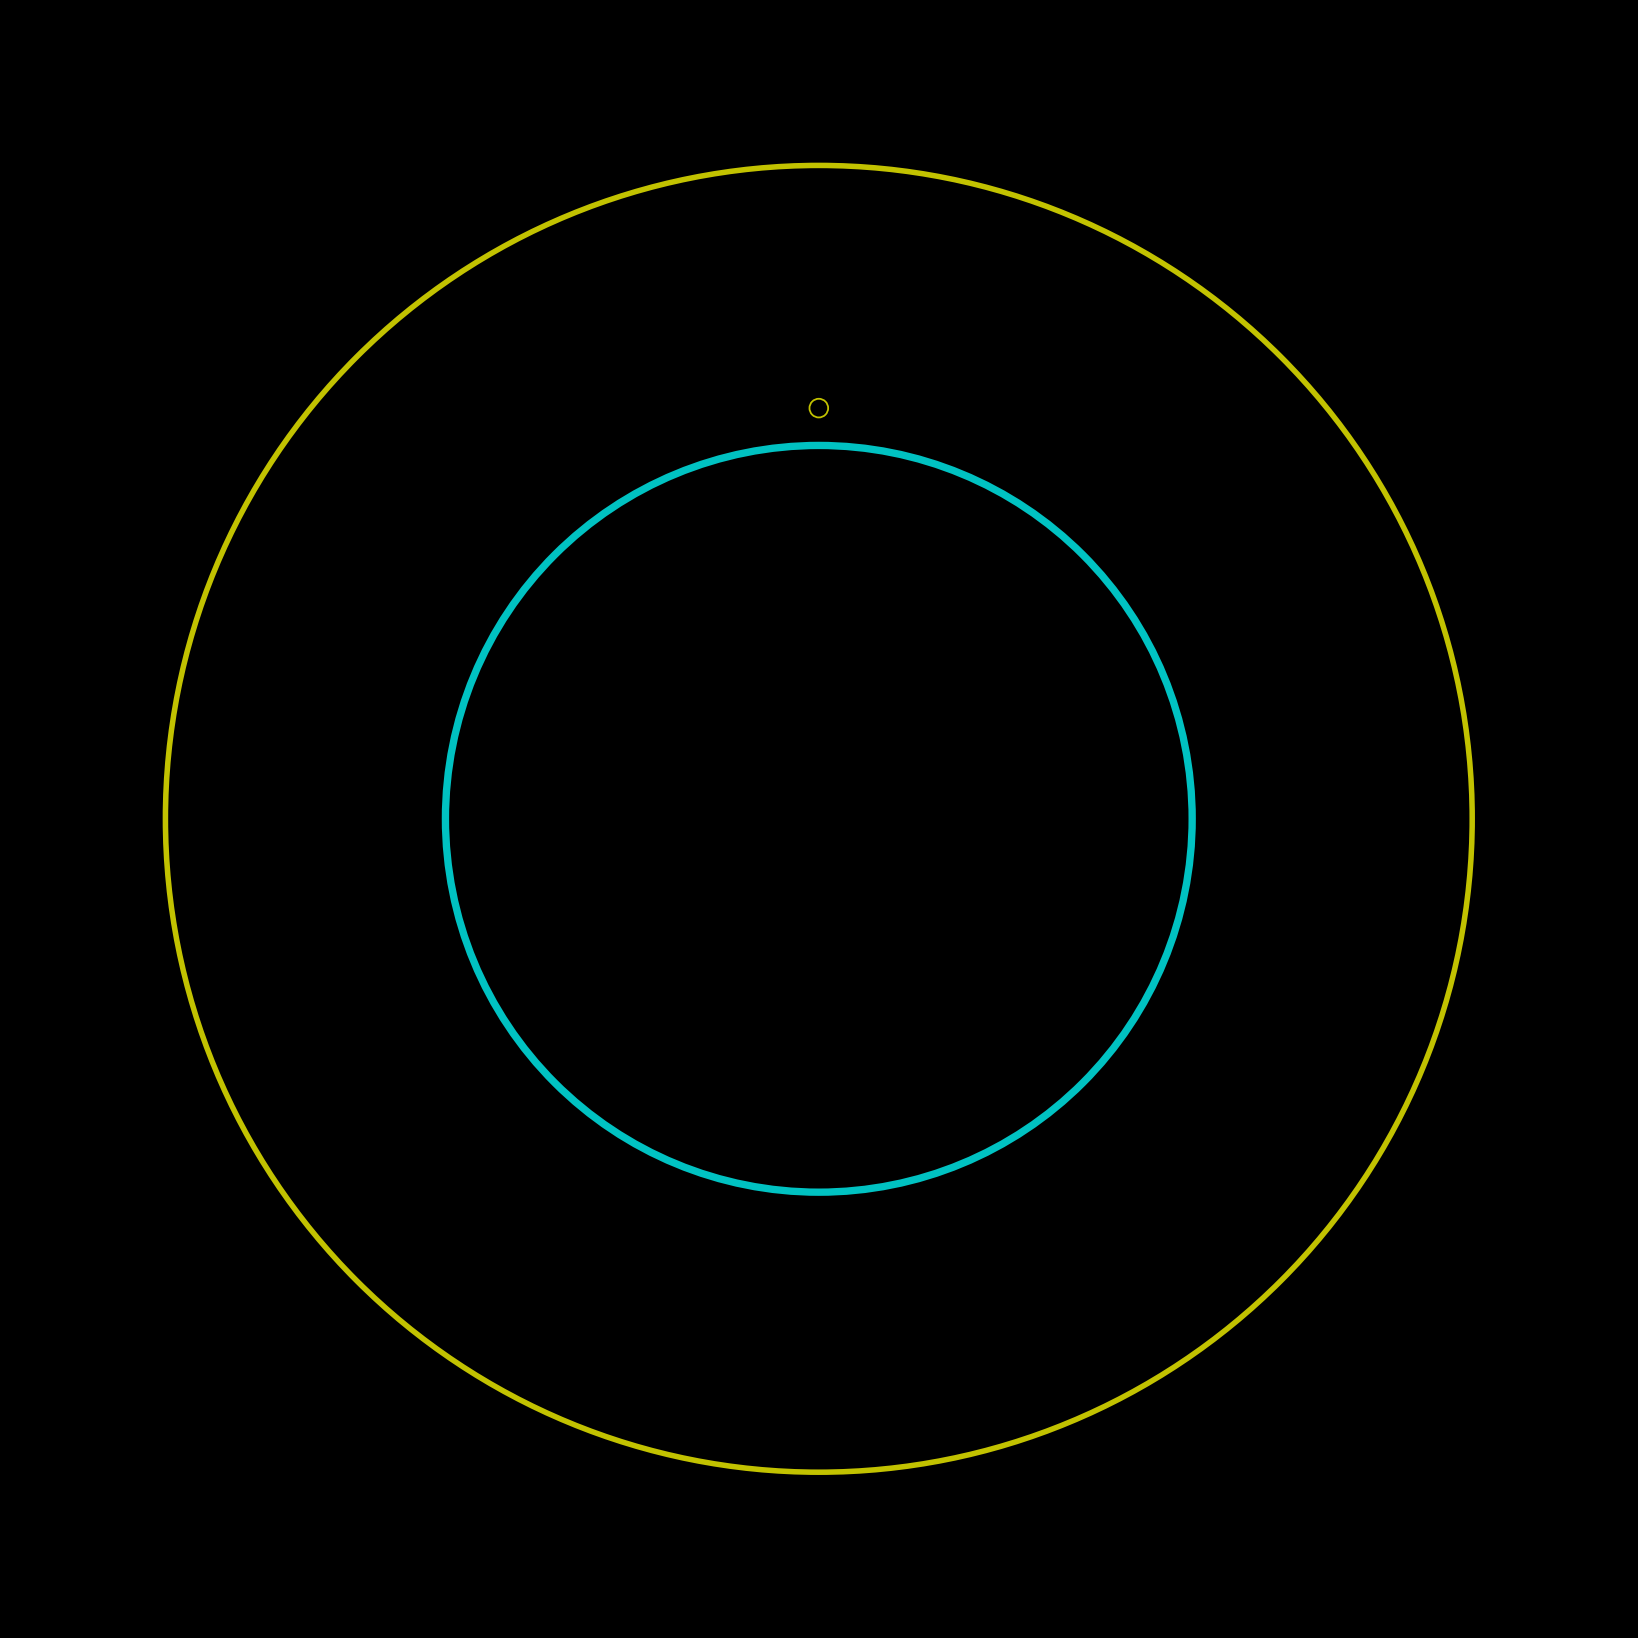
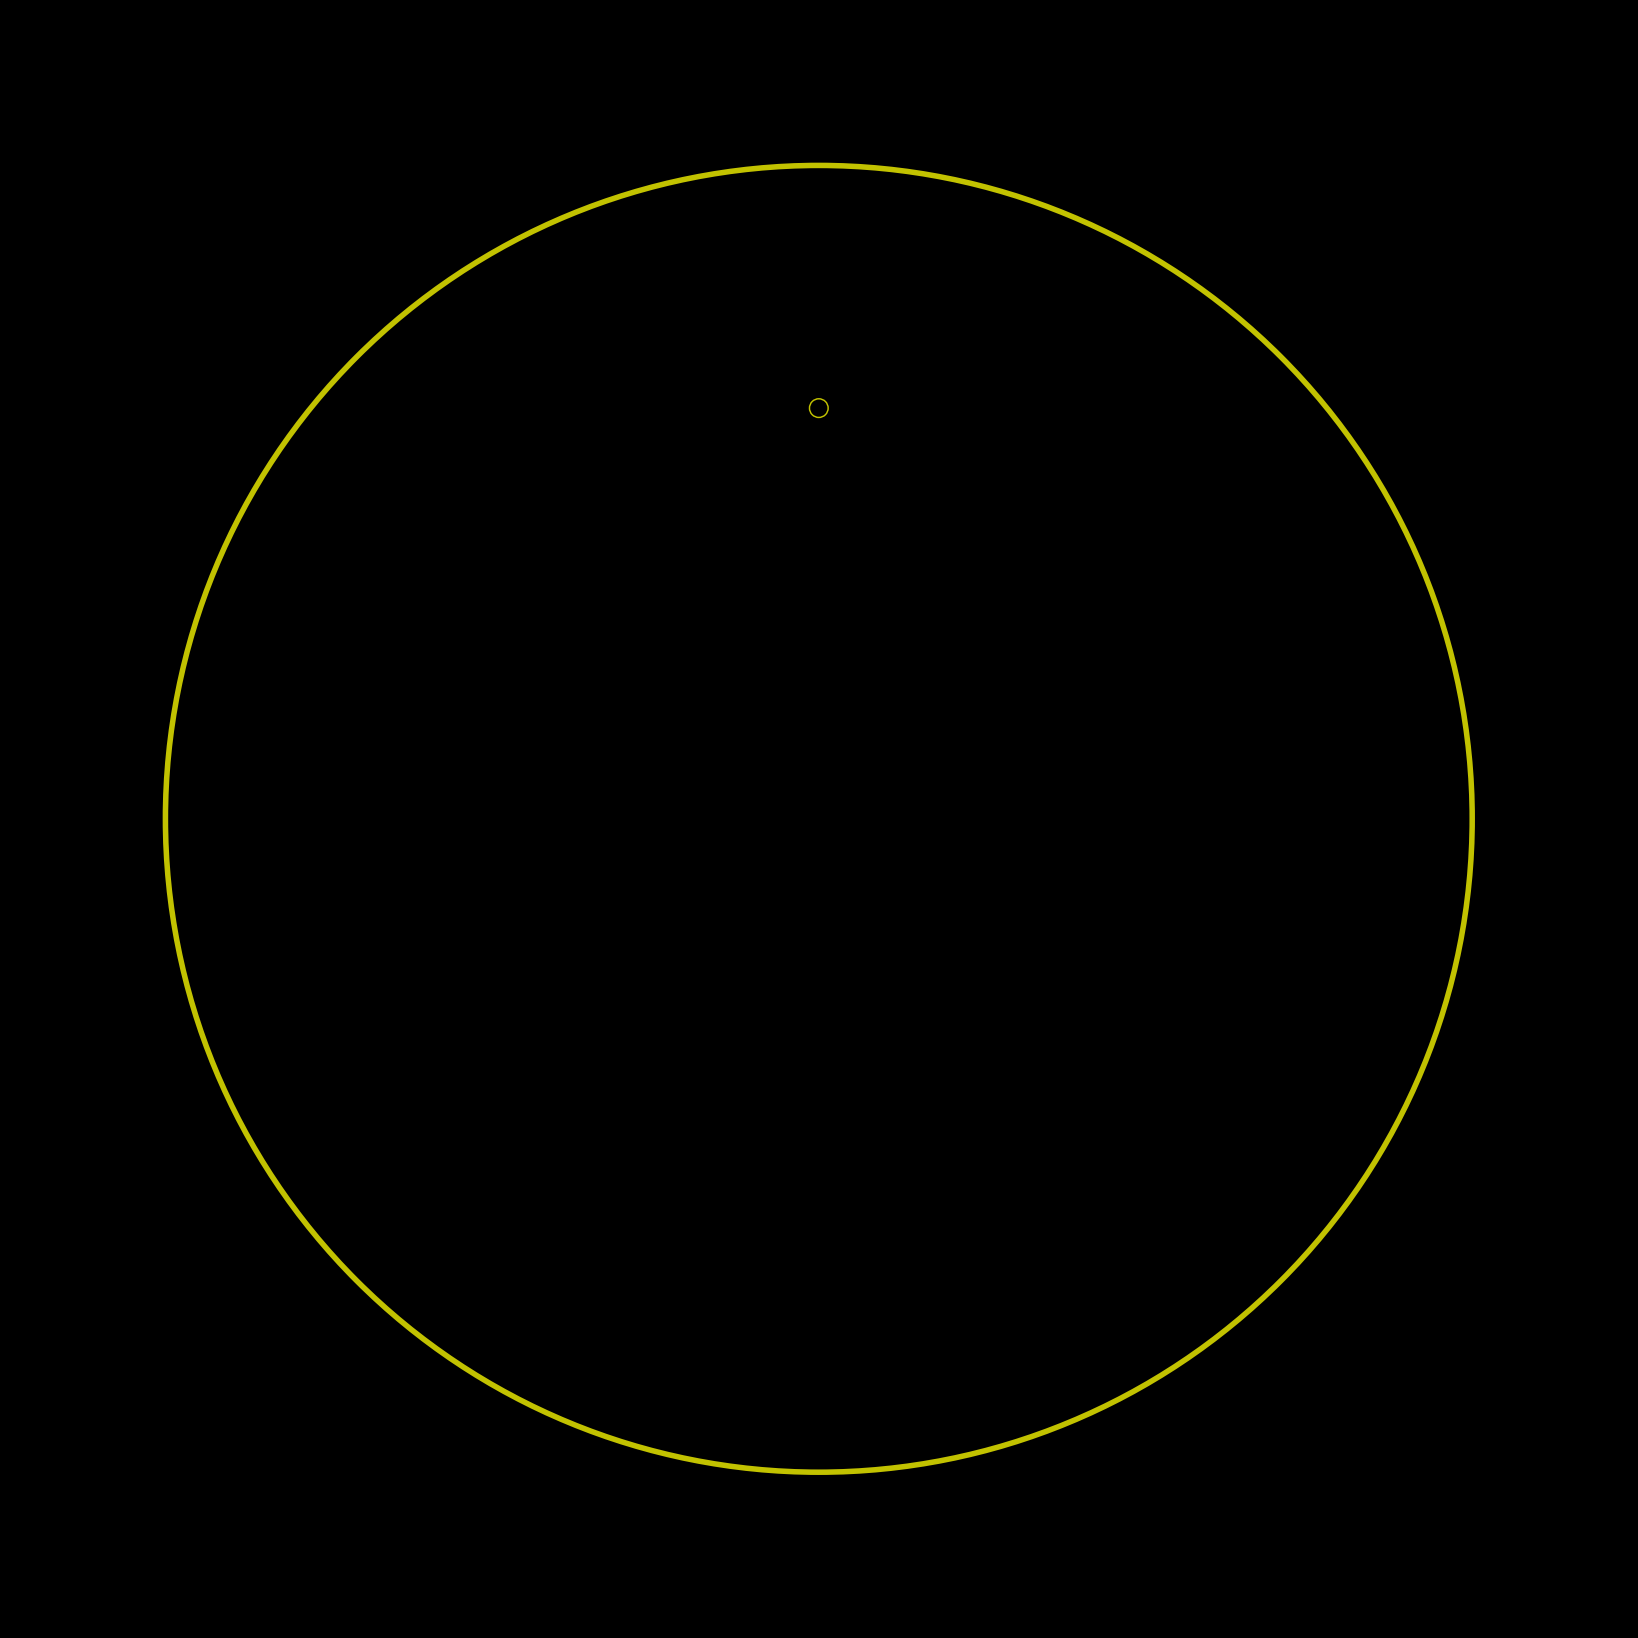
drawing: [441, 441, 1196, 1196] -> none

